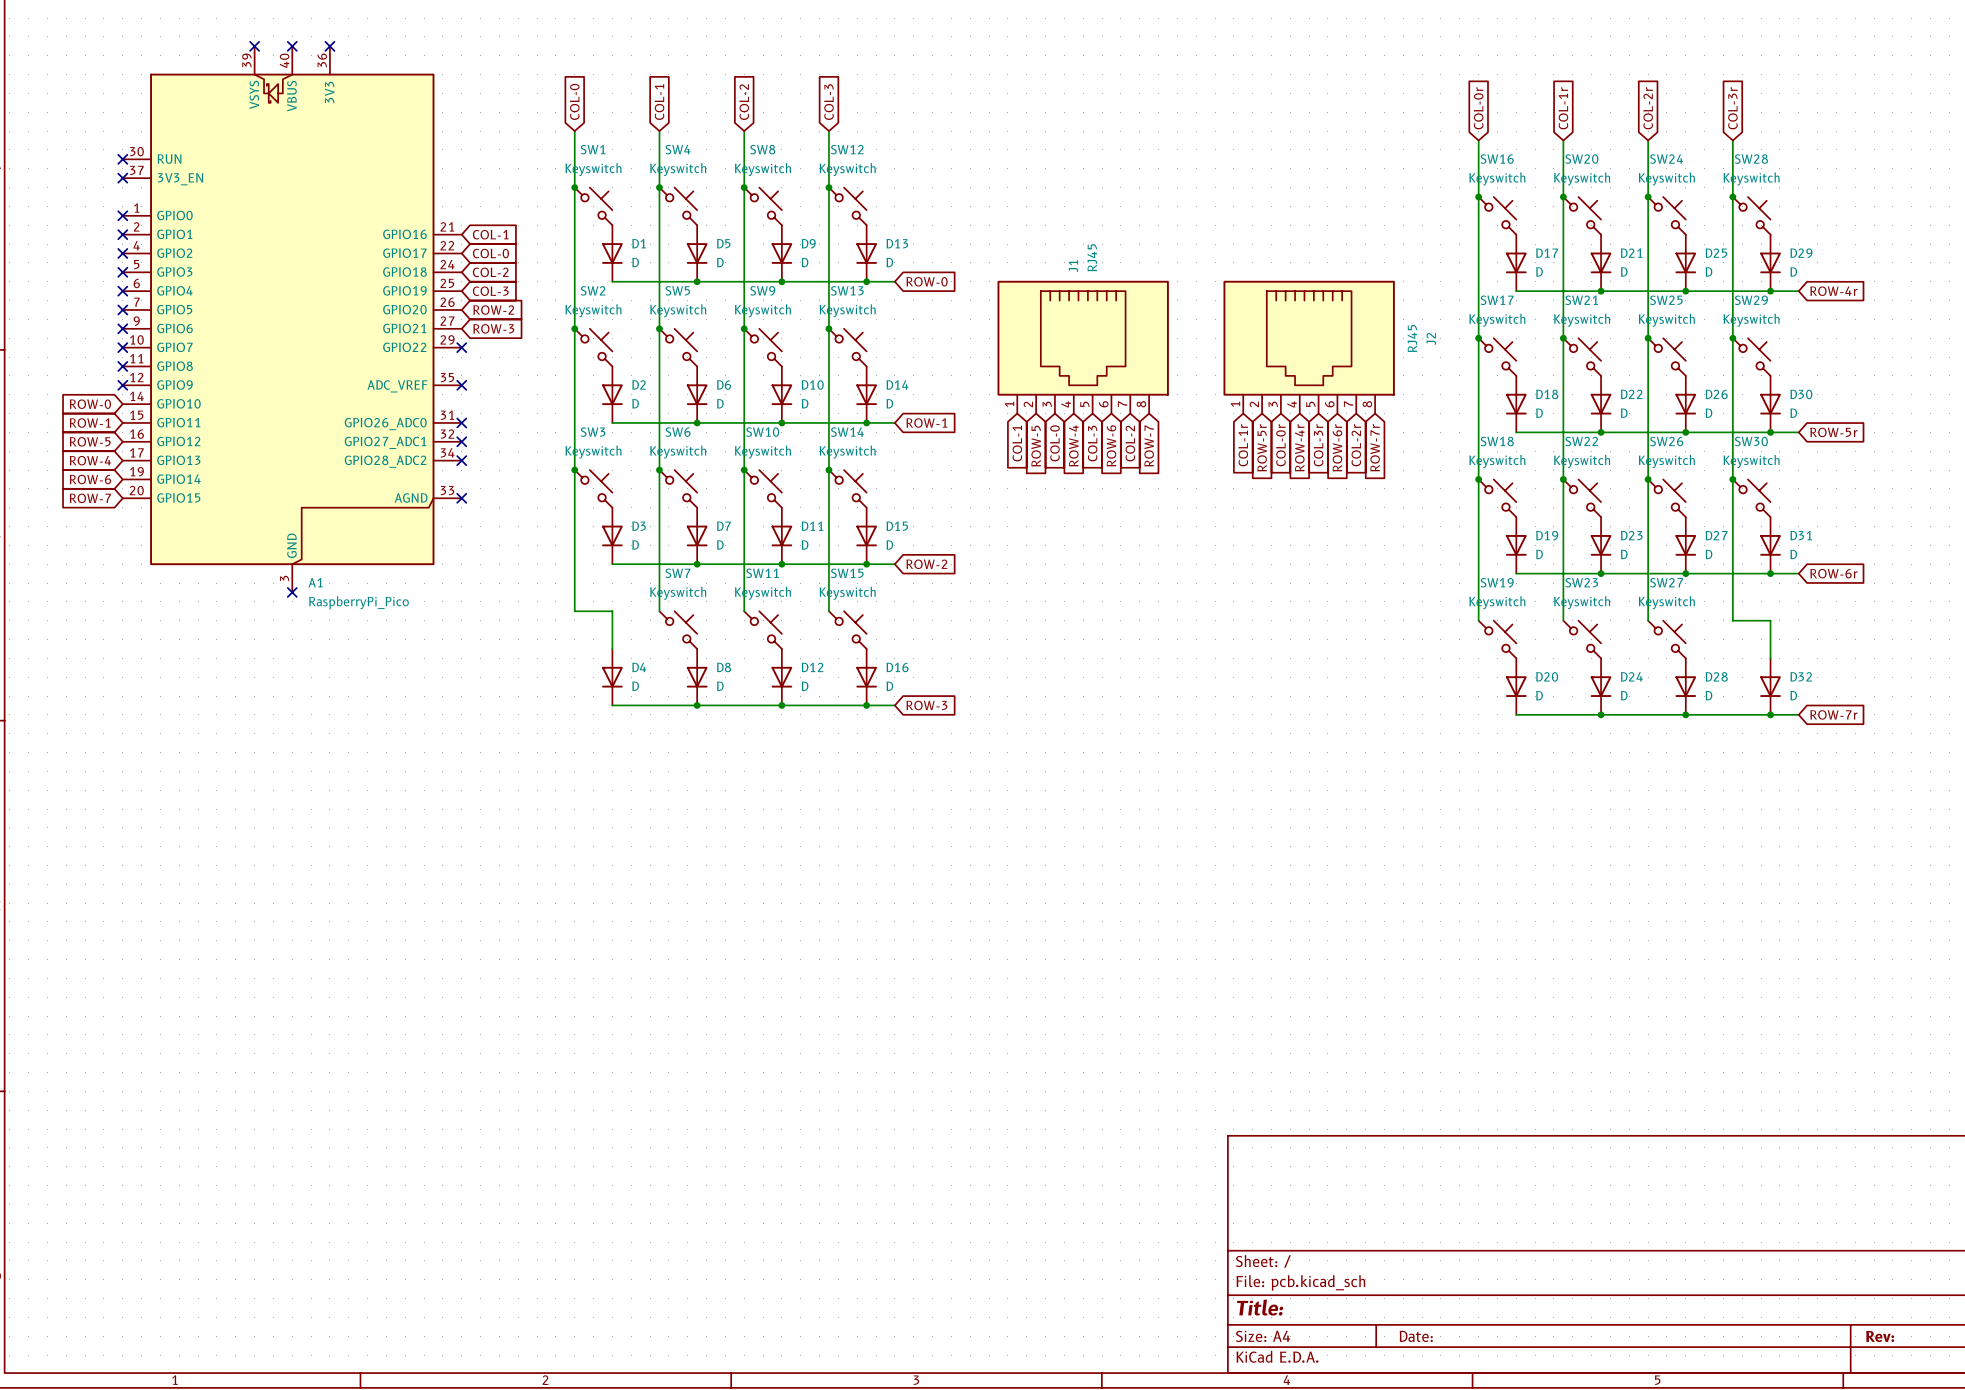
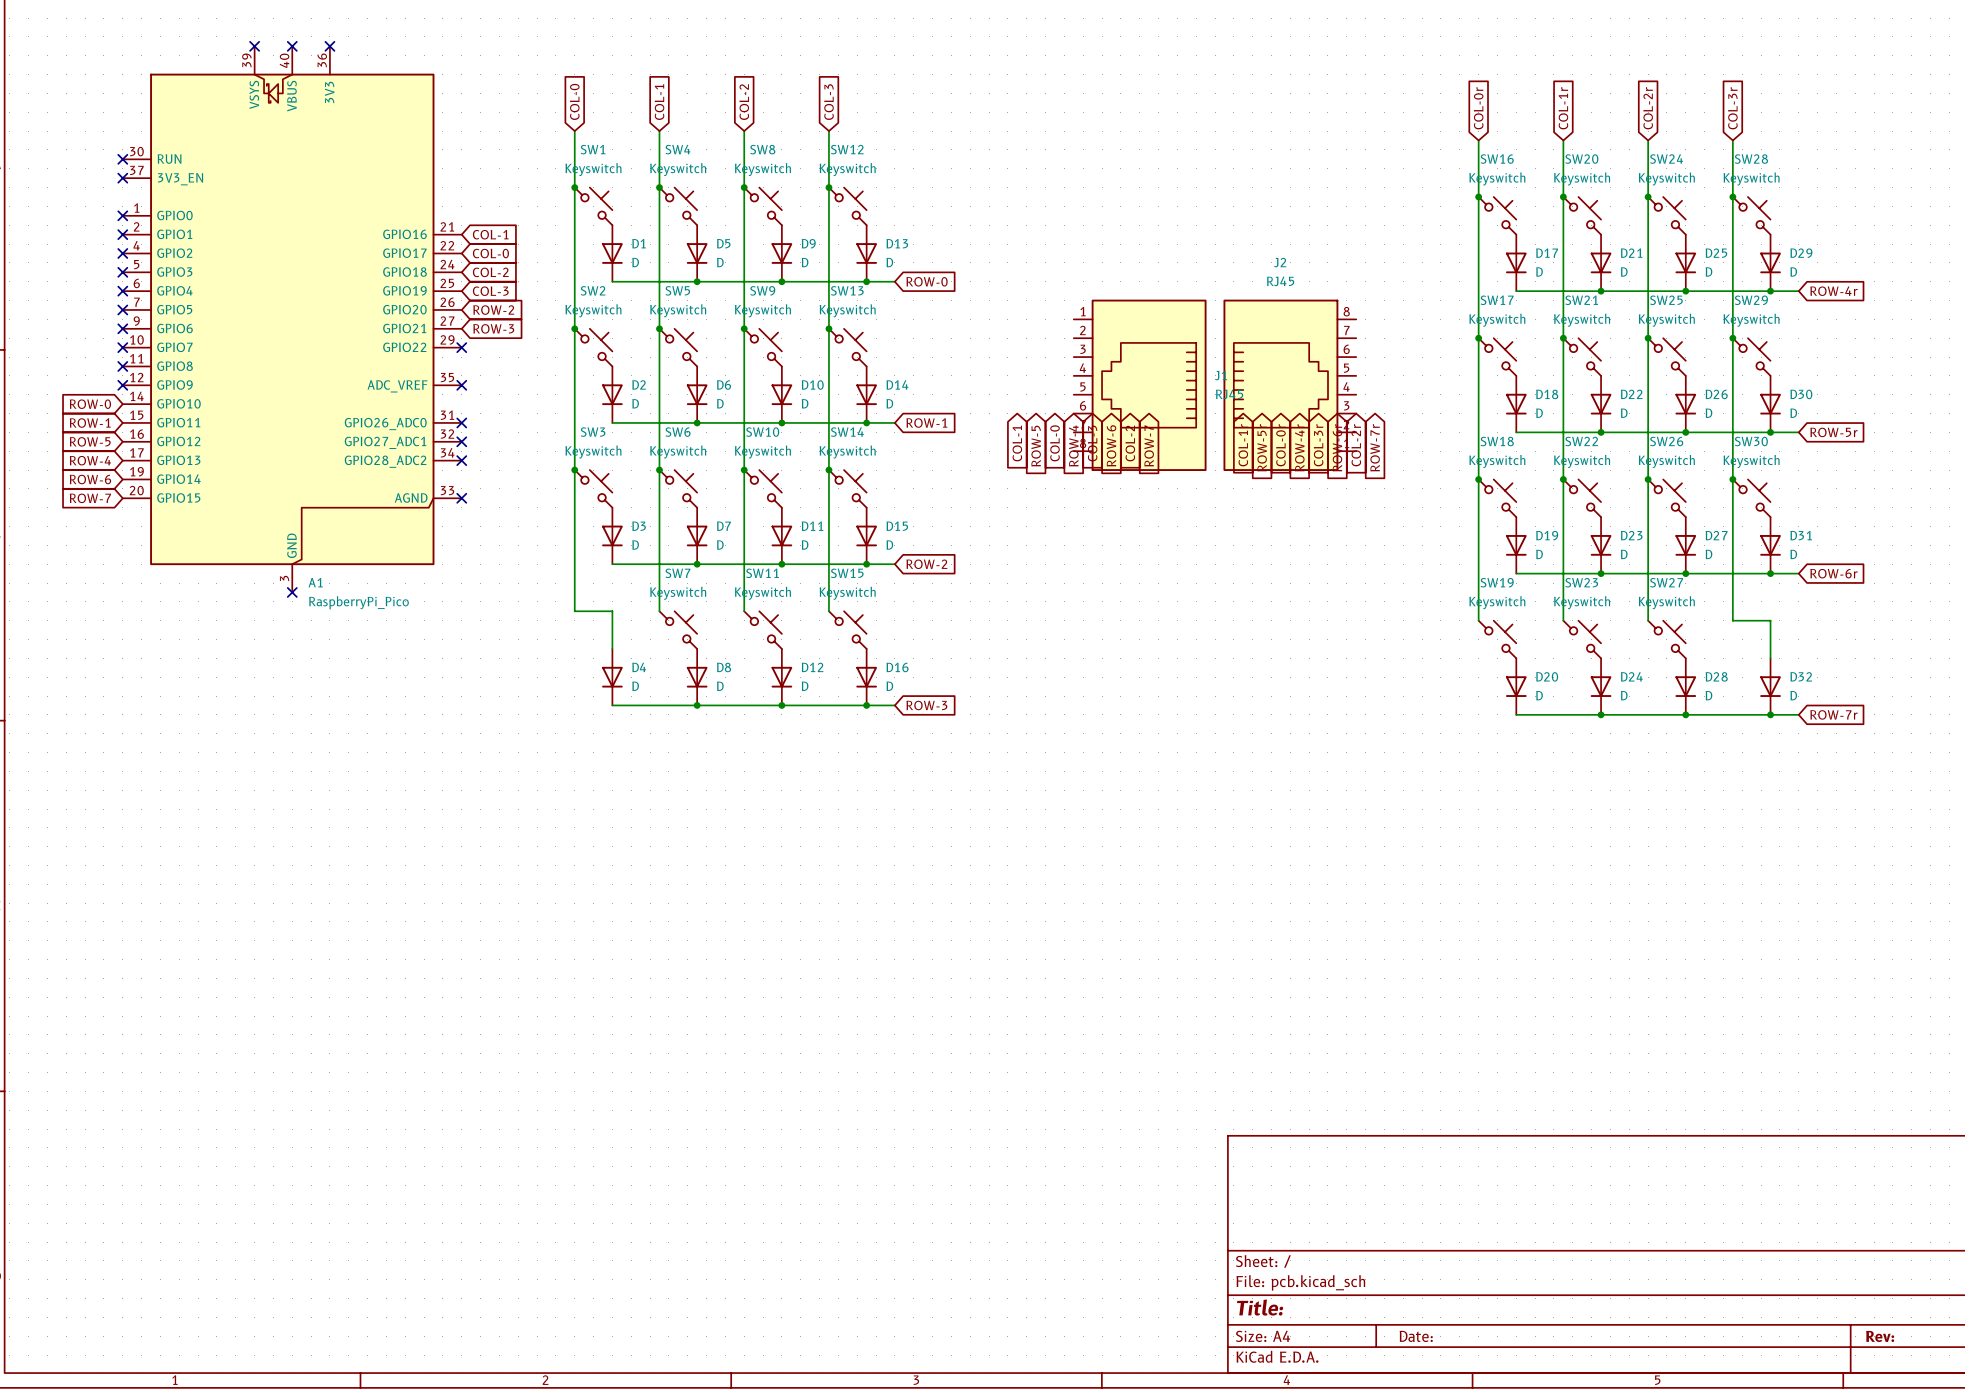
J1 rotation: 0° (1083, 338) -> 90° clockwise (1149, 385)
J2 rotation: 0° (1309, 338) -> 90° counterclockwise (1280, 385)

